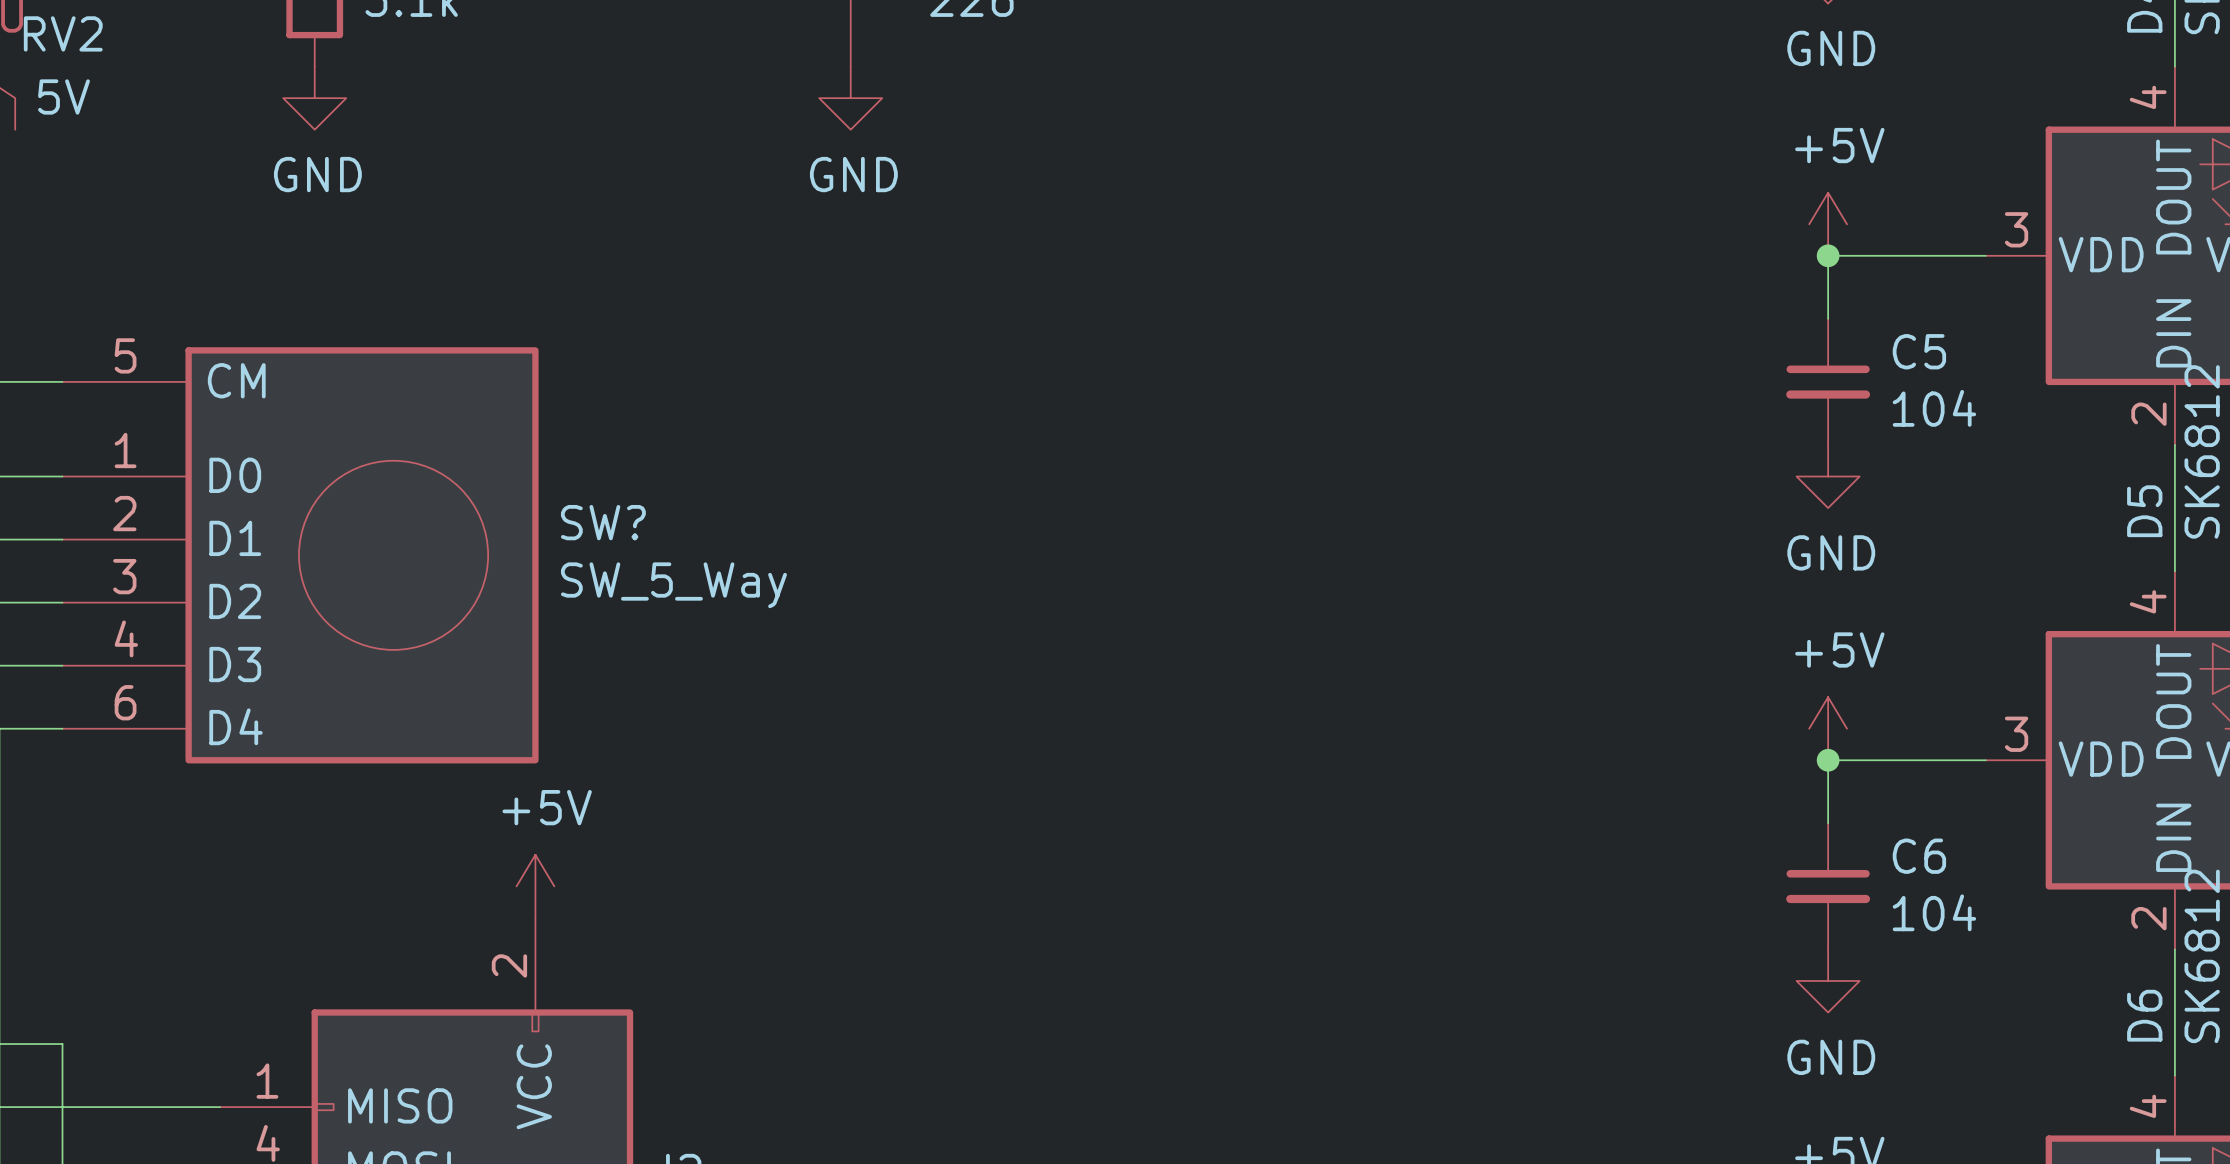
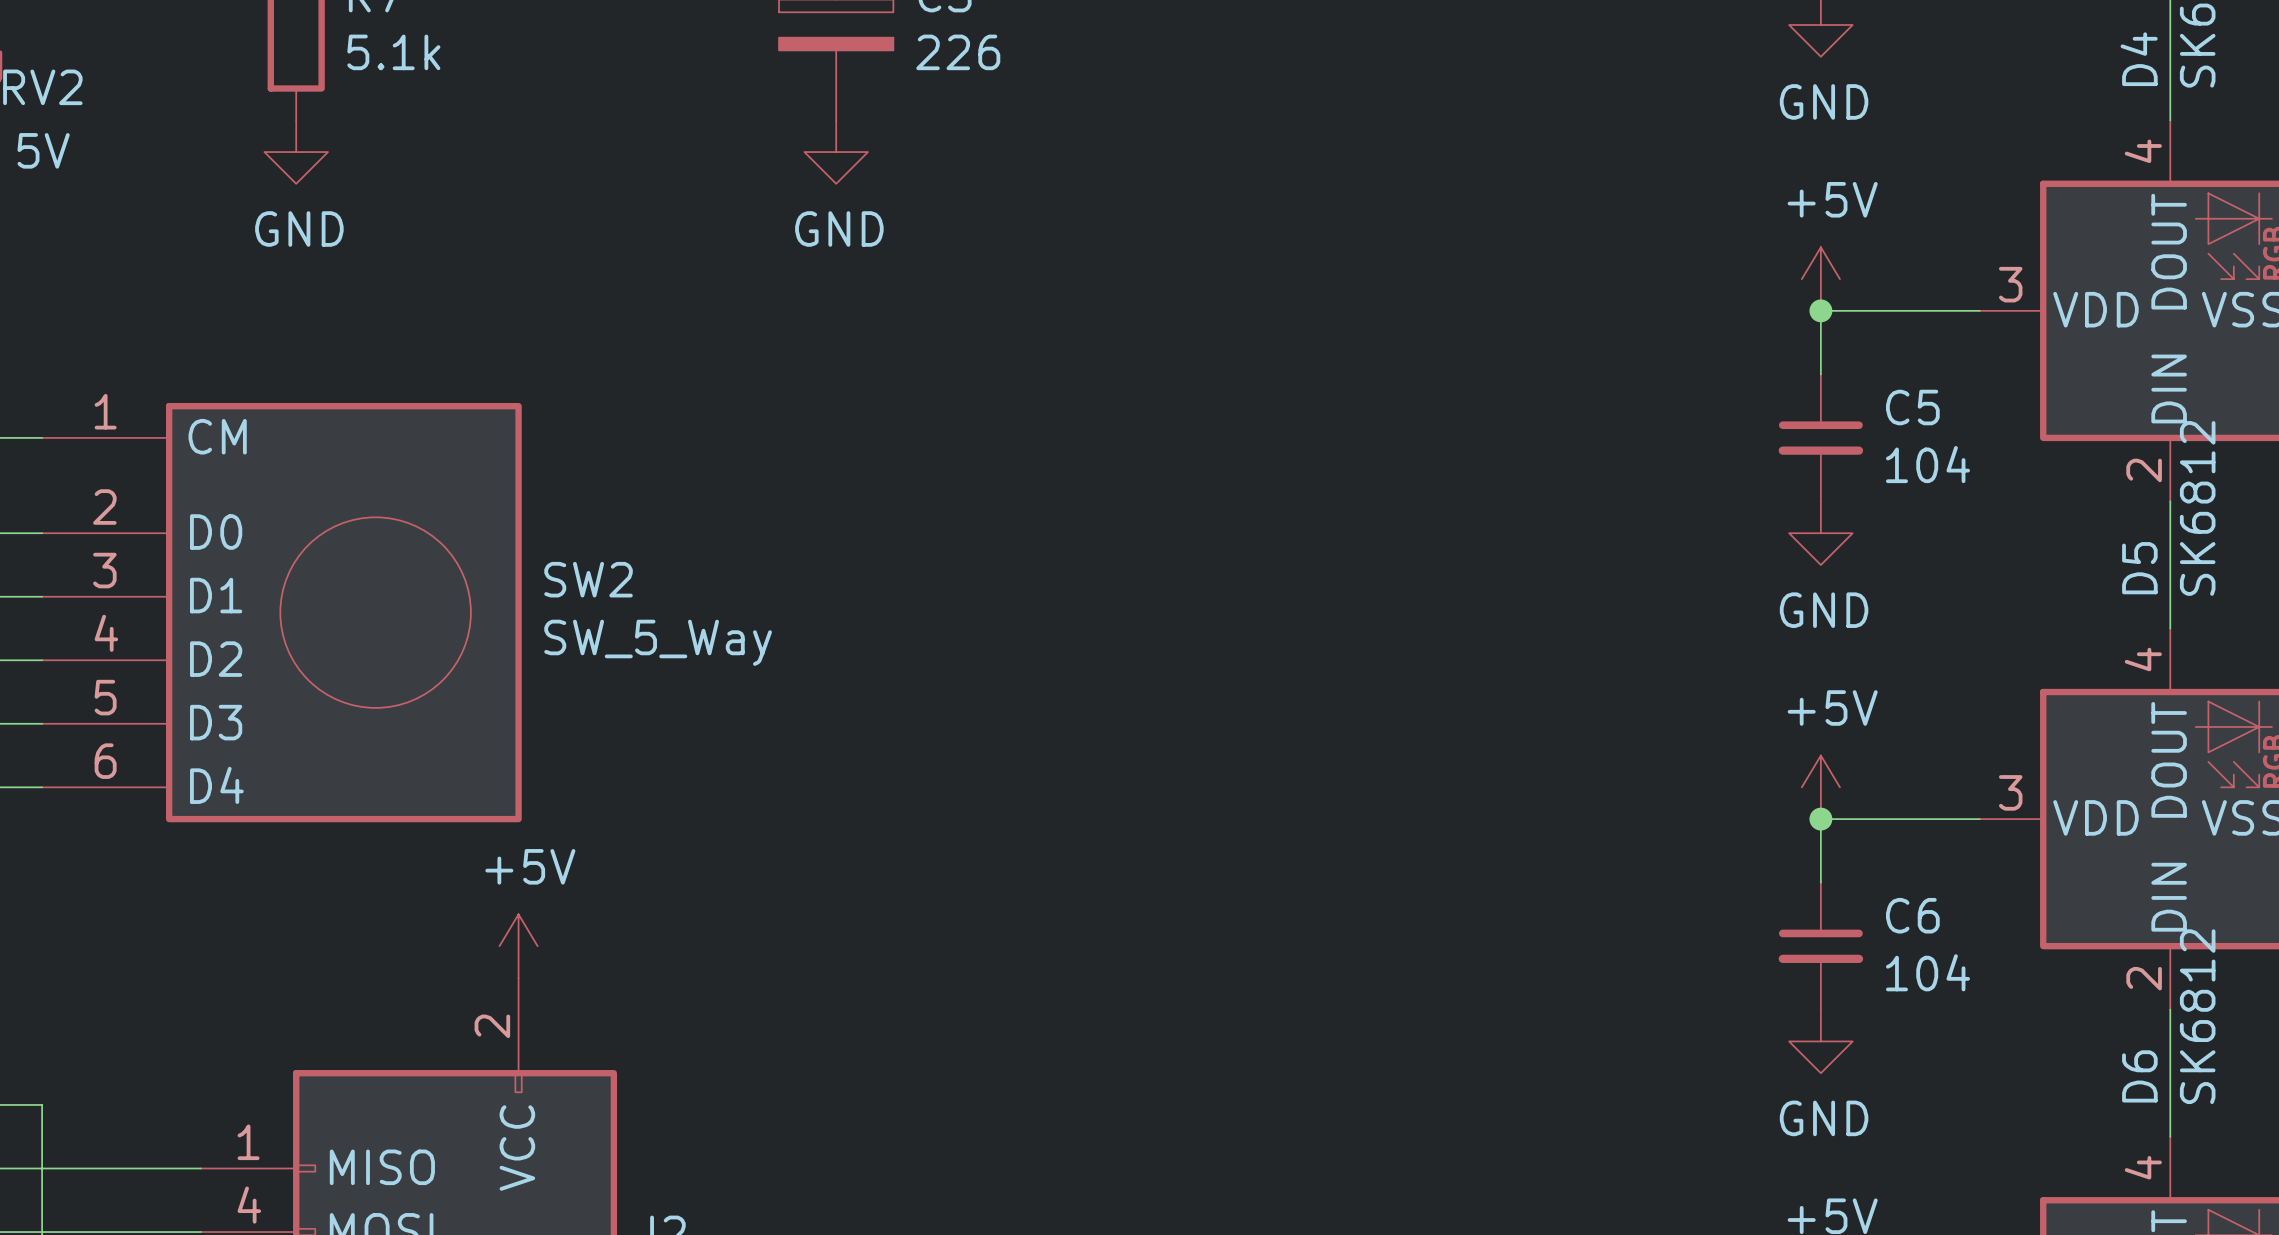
SW? pin number: 5 (125, 355) -> 1 (105, 411)
SW? pin number: 1 (125, 450) -> 2 (104, 507)
SW? pin number: 2 (124, 513) -> 3 (104, 570)
SW? name: SW? (603, 522) -> SW2 (588, 579)
SW? pin number: 3 (124, 576) -> 4 (106, 633)
SW? pin number: 4 (126, 638) -> 5 (105, 697)

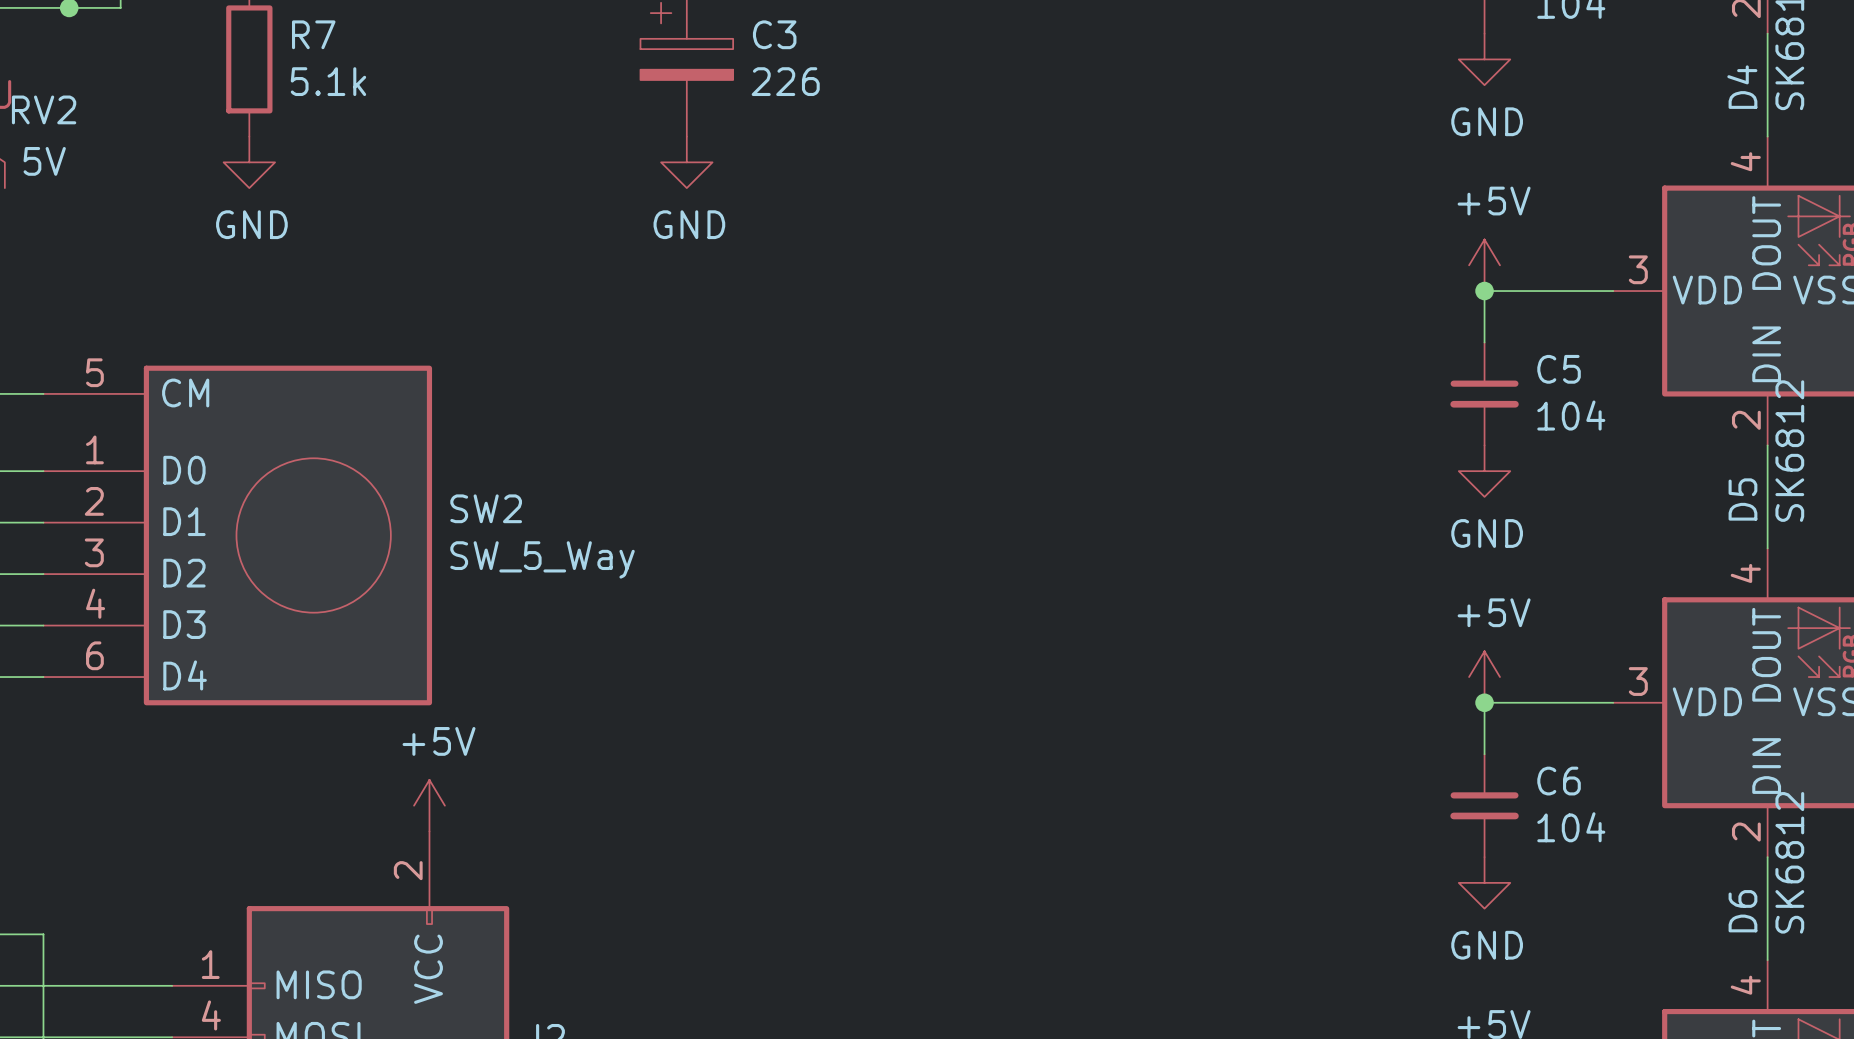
SW2 pin number: 1 (105, 411) -> 5 (94, 372)
SW2 pin number: 2 (104, 507) -> 1 (94, 449)
SW2 pin number: 3 (104, 570) -> 2 (94, 501)
SW2 pin number: 4 (106, 633) -> 3 (94, 552)
SW2 pin number: 5 (105, 697) -> 4 (95, 603)

